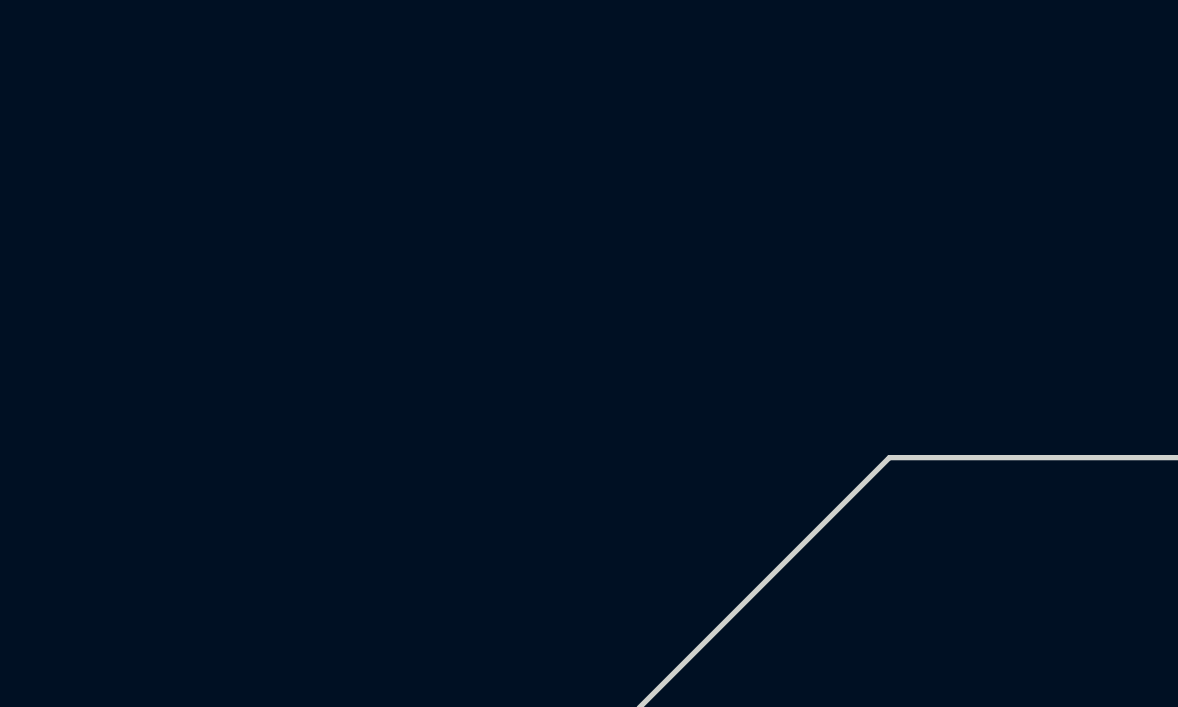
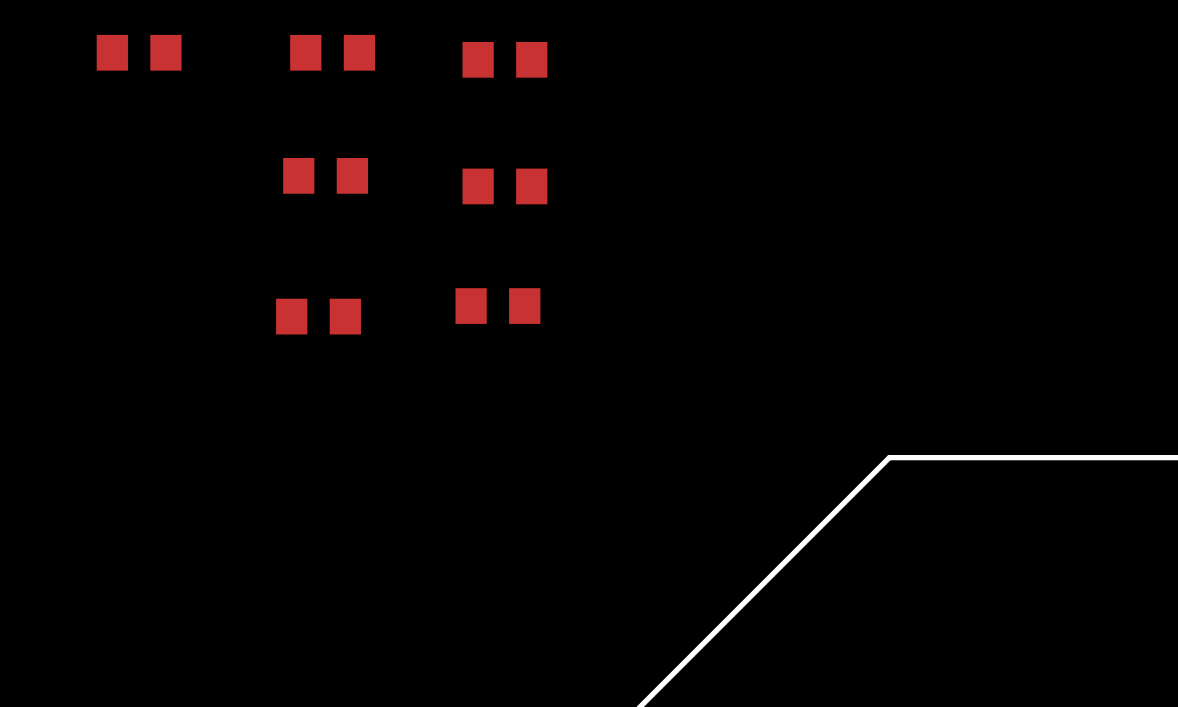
part: none -> (139, 52)
part: none -> (332, 52)
part: none -> (504, 59)
part: none -> (325, 175)
part: none -> (504, 186)
part: none -> (497, 306)
part: none -> (318, 316)

